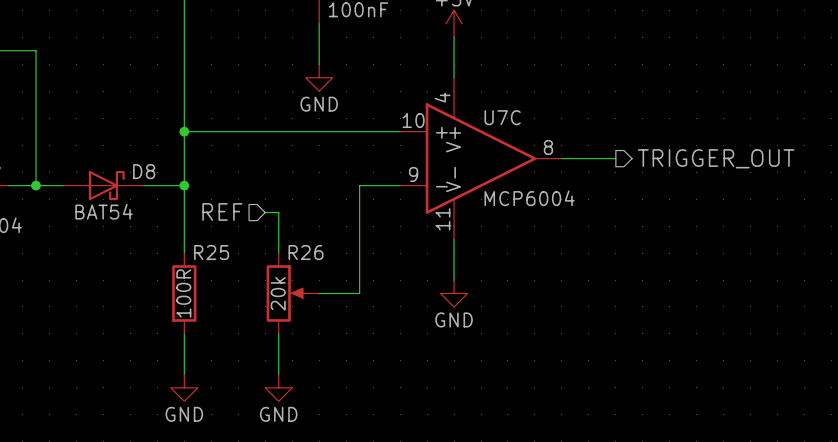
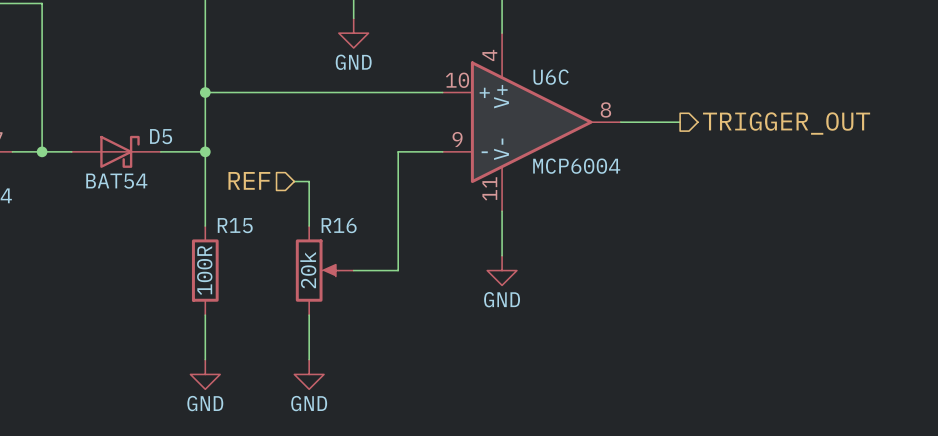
U7C name: U7C (502, 117) -> U6C (551, 77)
D8 name: D8 (144, 171) -> D5 (161, 136)
R25 name: R25 (211, 252) -> R15 (235, 225)
R26 name: R26 (306, 252) -> R16 (339, 225)

